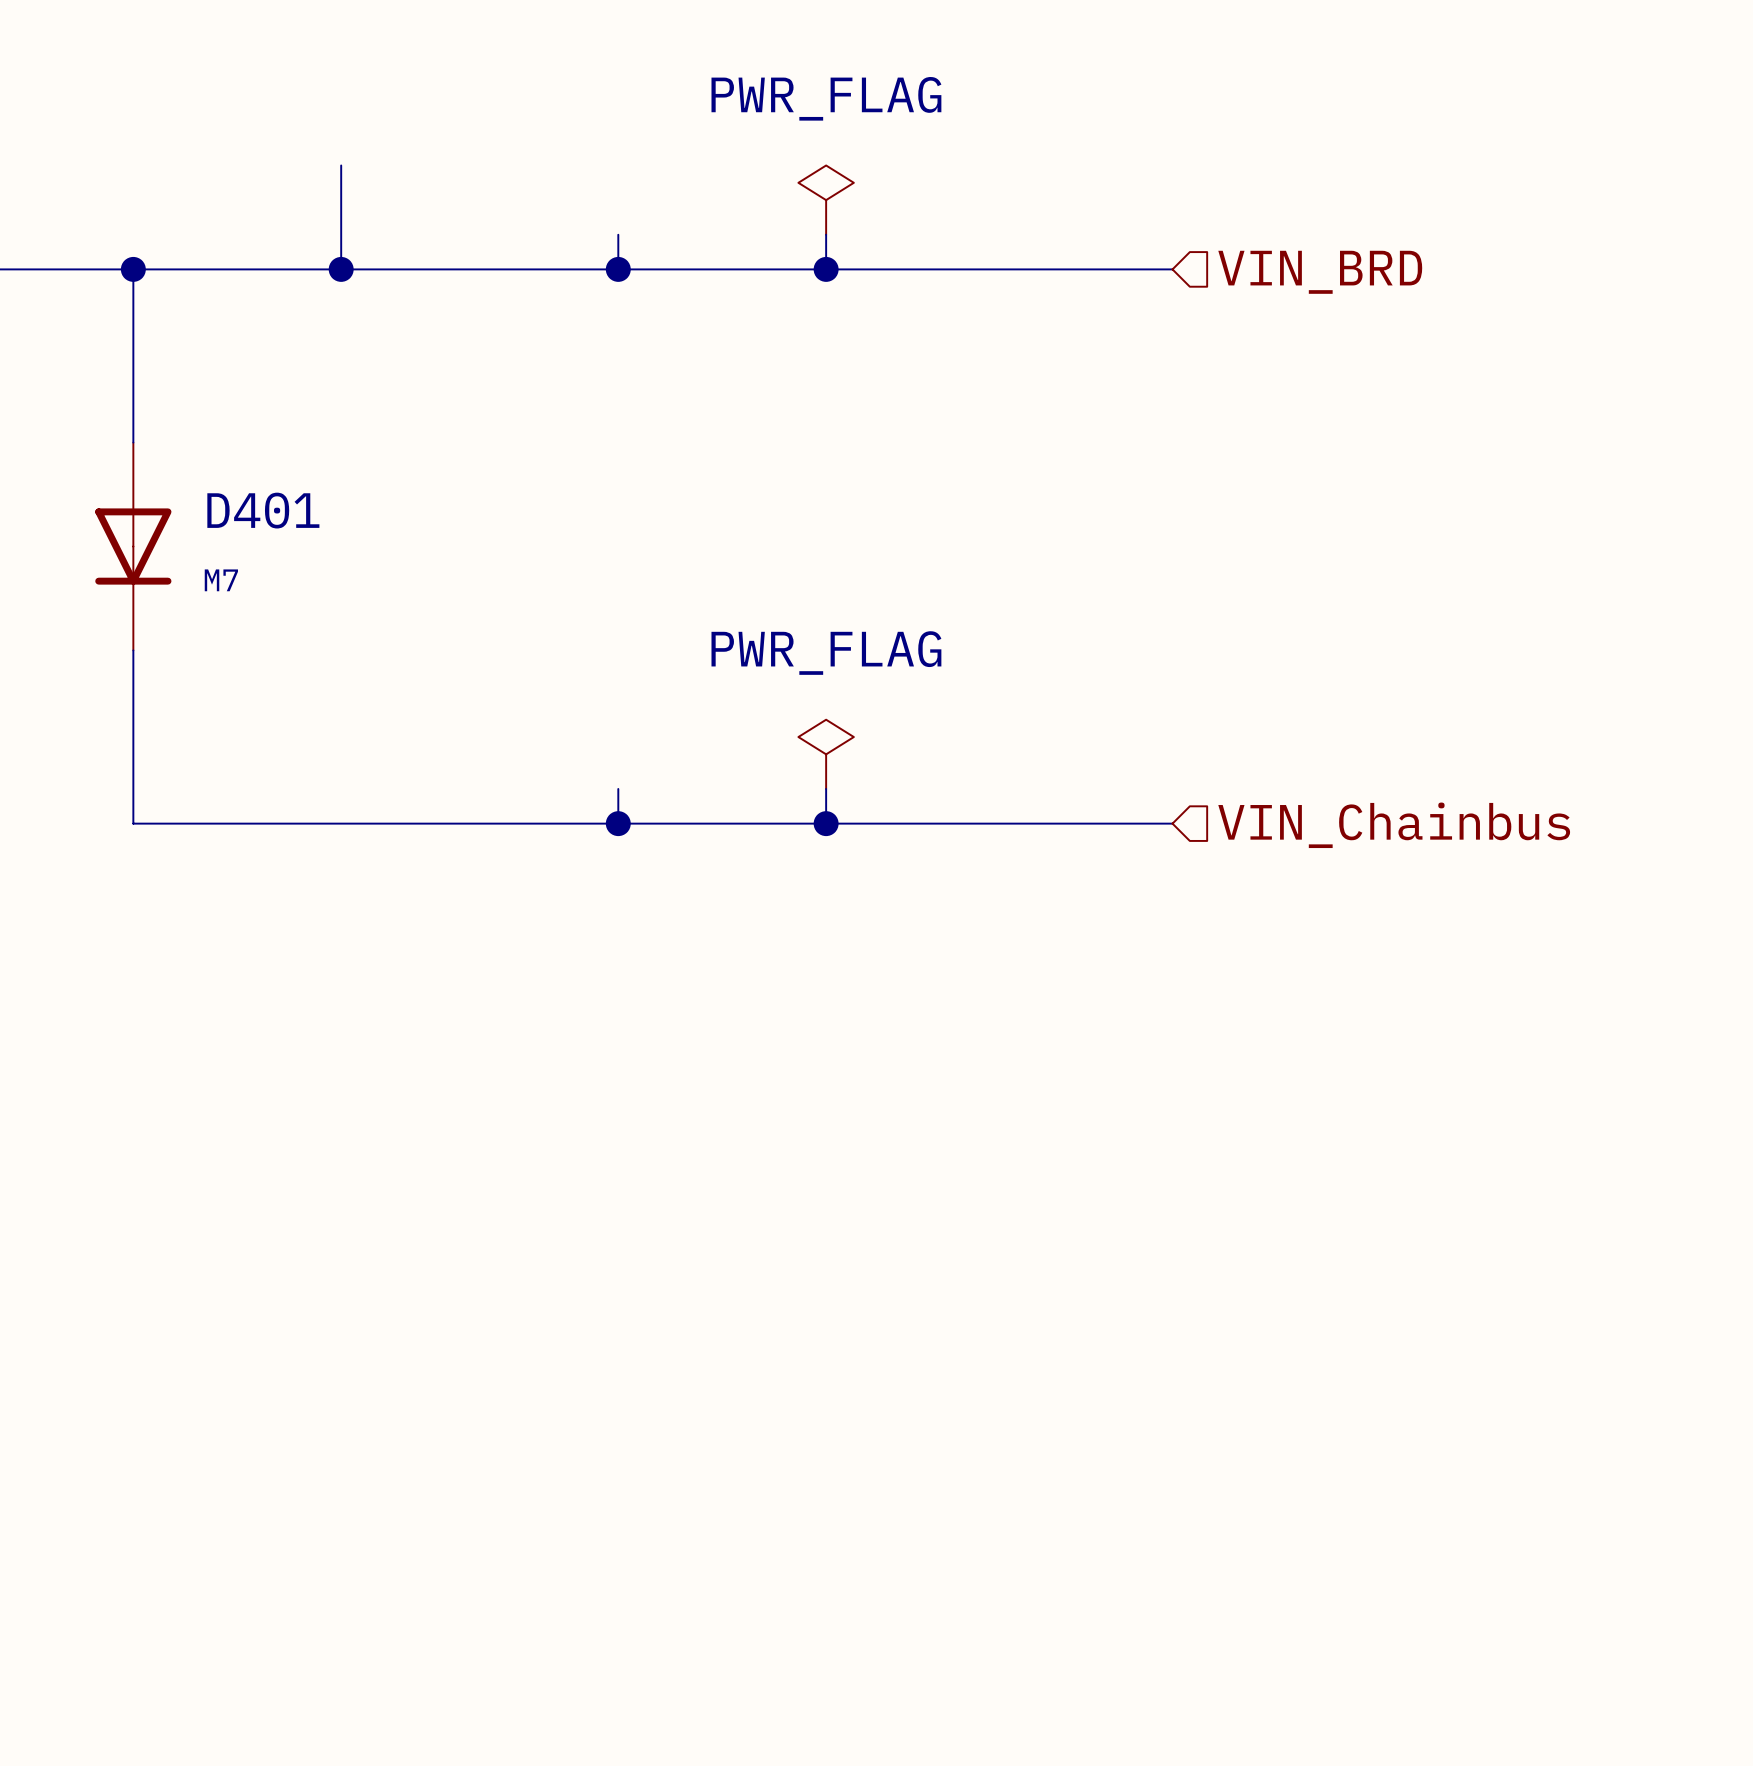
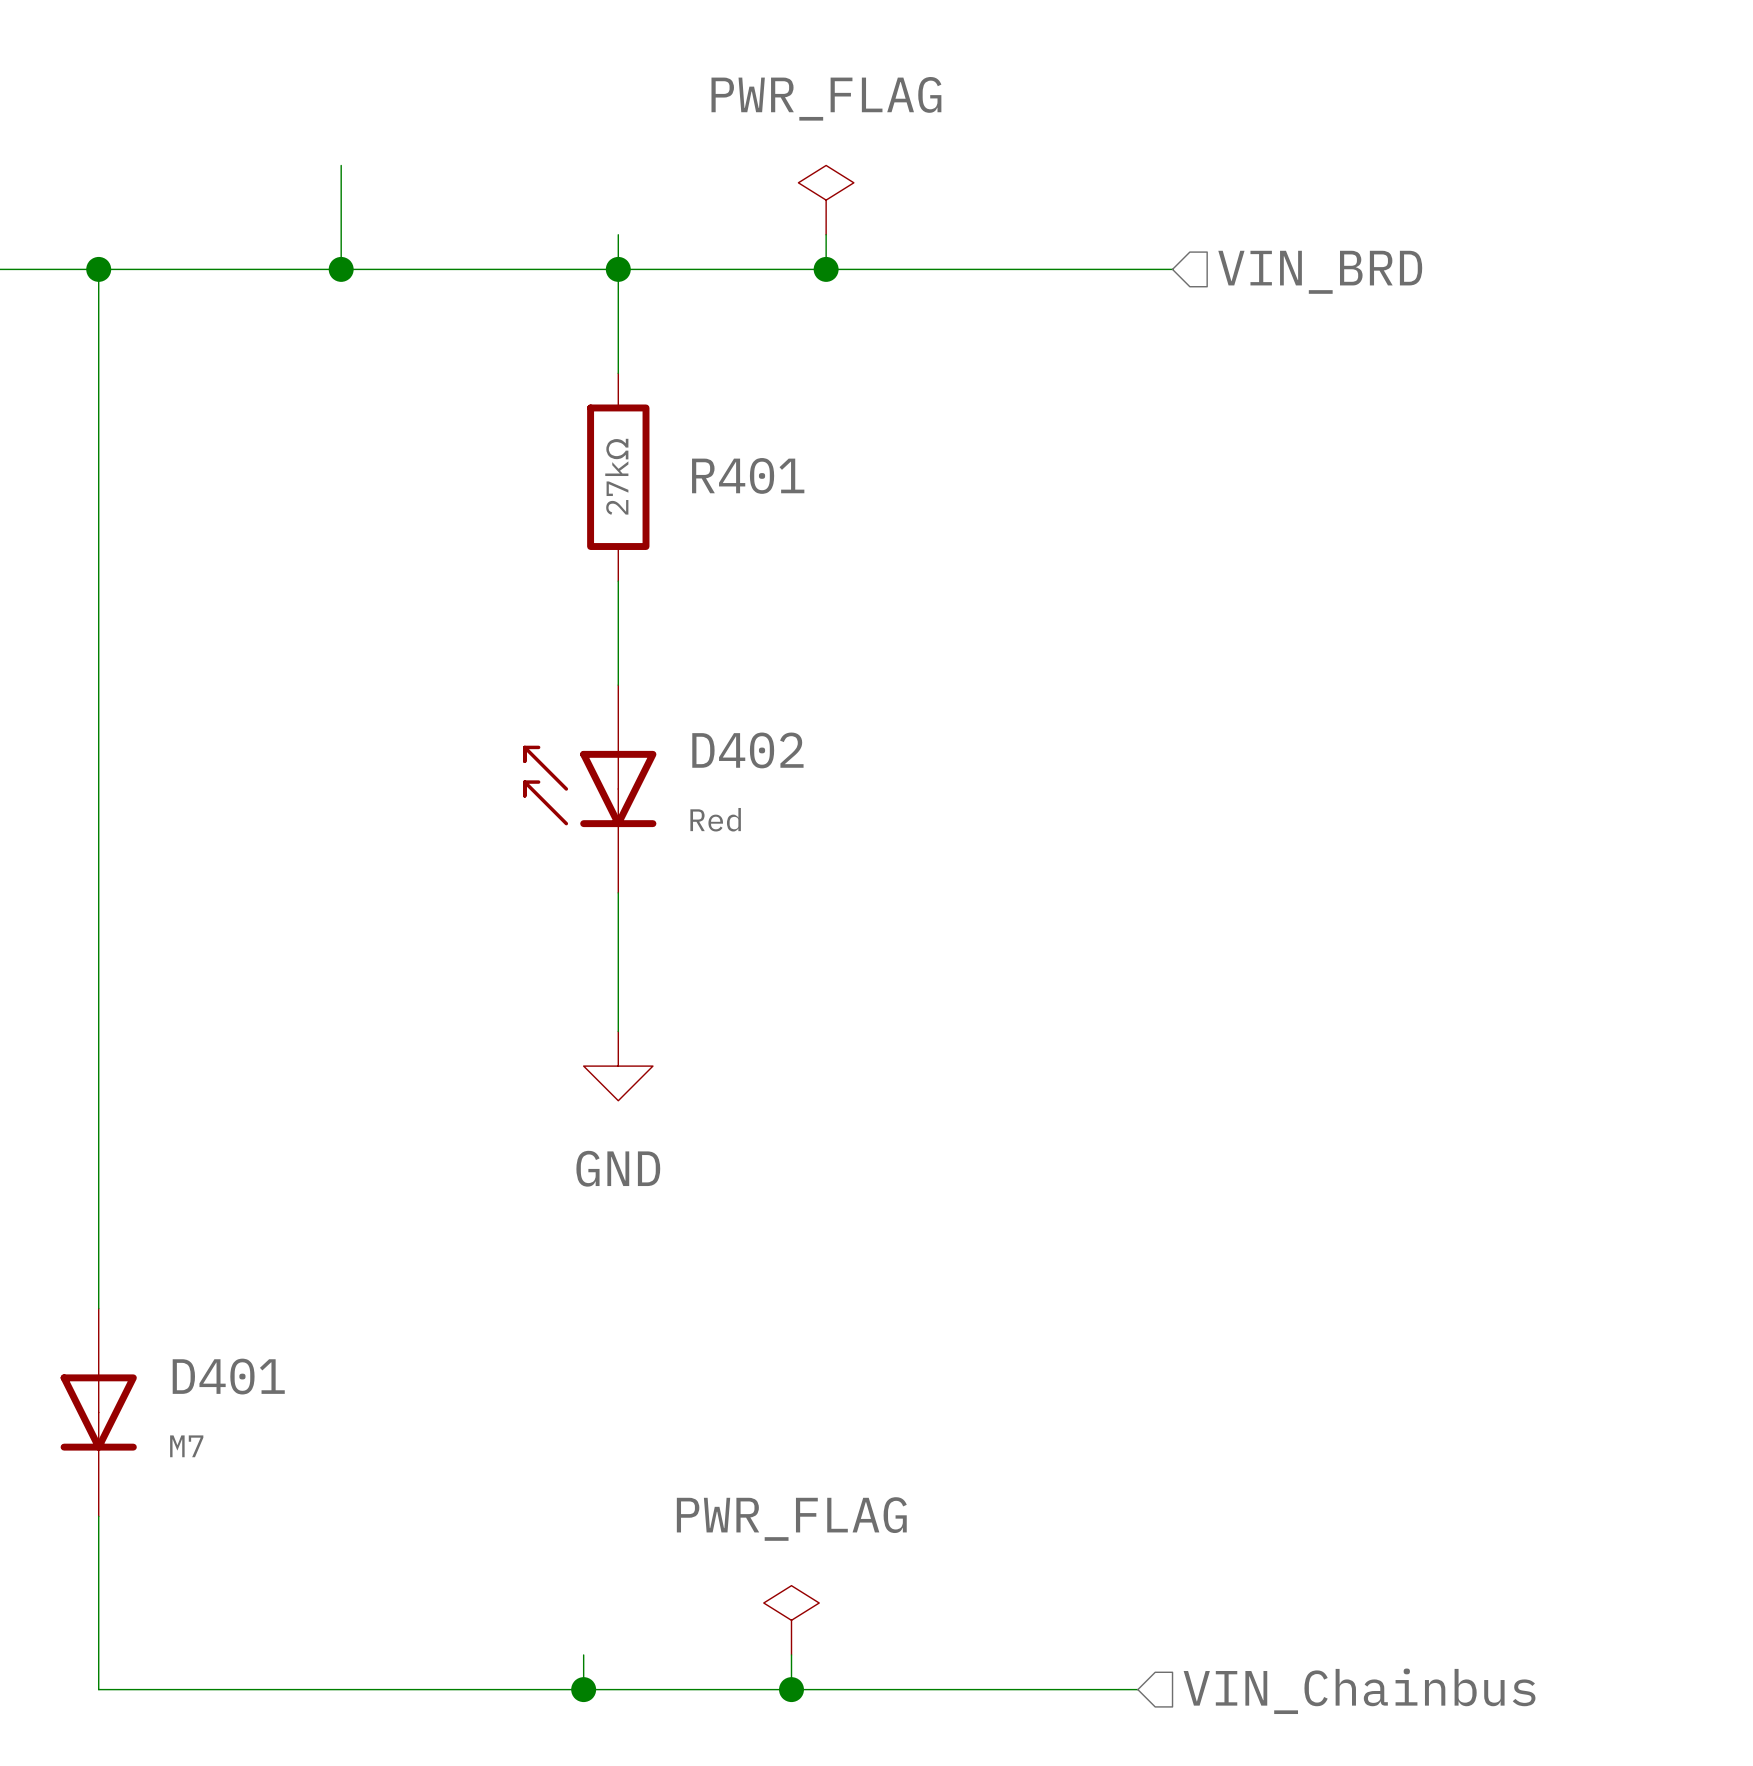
wire: none -> (98, 269) (98, 1308)
wire: (133, 269) (133, 442) -> none
junction position: (133, 269) -> (98, 269)
wire: none -> (618, 269) (618, 373)
R401: none -> 27kΩ (618, 477)
D401 position: (133, 546) -> (98, 1412)
wire: none -> (618, 581) (618, 685)
wire: (133, 650) (133, 823) (1172, 823) -> none
power symbol: PWR_FLAG (826, 754) -> none
D402: none -> Red (589, 788)
wire: (826, 788) (826, 823) -> none
junction: (618, 823) -> none
junction: (826, 823) -> none
hierarchical label: VIN_Chainbus (1394, 825) -> none
wire: none -> (618, 892) (618, 1031)
power symbol: none -> GND (618, 1066)
wire: none -> (98, 1516) (98, 1689) (1137, 1689)
power symbol: none -> PWR_FLAG (791, 1620)
wire: none -> (583, 1654) (583, 1689)
wire: none -> (791, 1654) (791, 1689)
junction: none -> (583, 1689)
junction: none -> (791, 1689)
hierarchical label: none -> VIN_Chainbus (1359, 1691)

